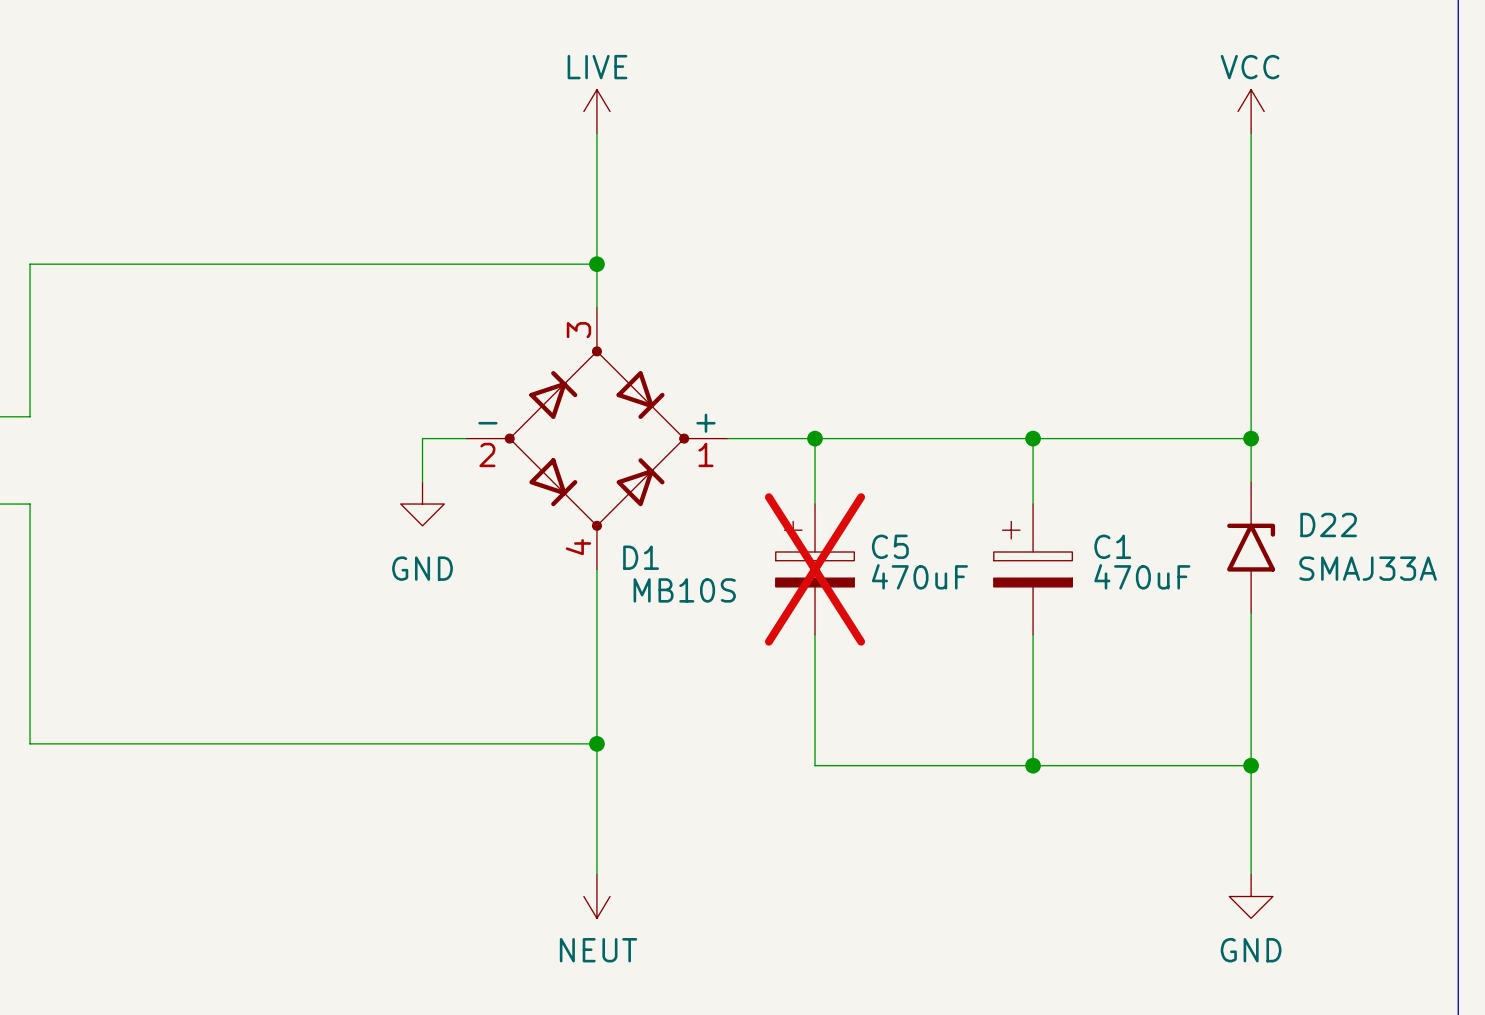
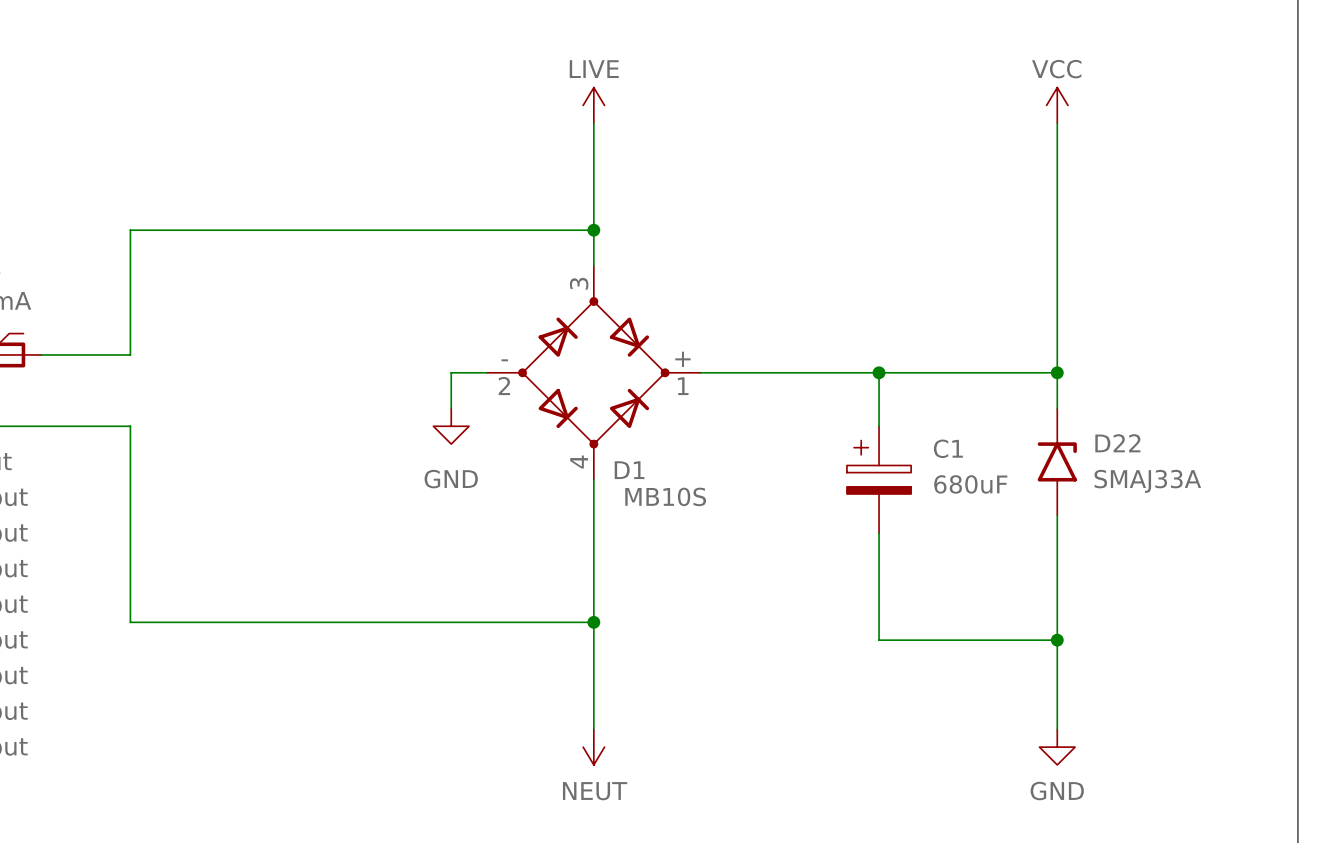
power symbol position: VCC (1251, 111) -> VCC (1057, 105)
wire: (1251, 133) (1251, 482) -> (1057, 123) (1057, 408)
wire: (815, 438) (815, 504) -> none
junction: (815, 438) -> none
junction: none -> (879, 372)
wire: (1033, 438) (1033, 504) -> (879, 372) (879, 426)
junction: (1033, 438) -> none
wire: (1163, 438) (1251, 438) -> none
junction: none -> (1057, 372)
junction: (1251, 438) -> none
C1 name position: C1 (1112, 546) -> C1 (948, 448)
D22 position: (1251, 547) -> (1057, 461)
C5: 470uF (815, 569) -> none
C1 position: (1033, 569) -> (879, 479)
C1 value: 470uF (1142, 576) -> 680uF (970, 484)
wire: (1251, 613) (1251, 874) -> (1057, 515) (1057, 729)
wire: (815, 634) (815, 765) (945, 765) -> (879, 533) (879, 640)
wire: (1033, 634) (1033, 765) -> none
junction: (1033, 765) -> none
wire: (1163, 765) (1251, 765) -> none
junction: none -> (1057, 640)
junction: (1251, 765) -> none
power symbol position: GND (1251, 896) -> GND (1057, 747)

